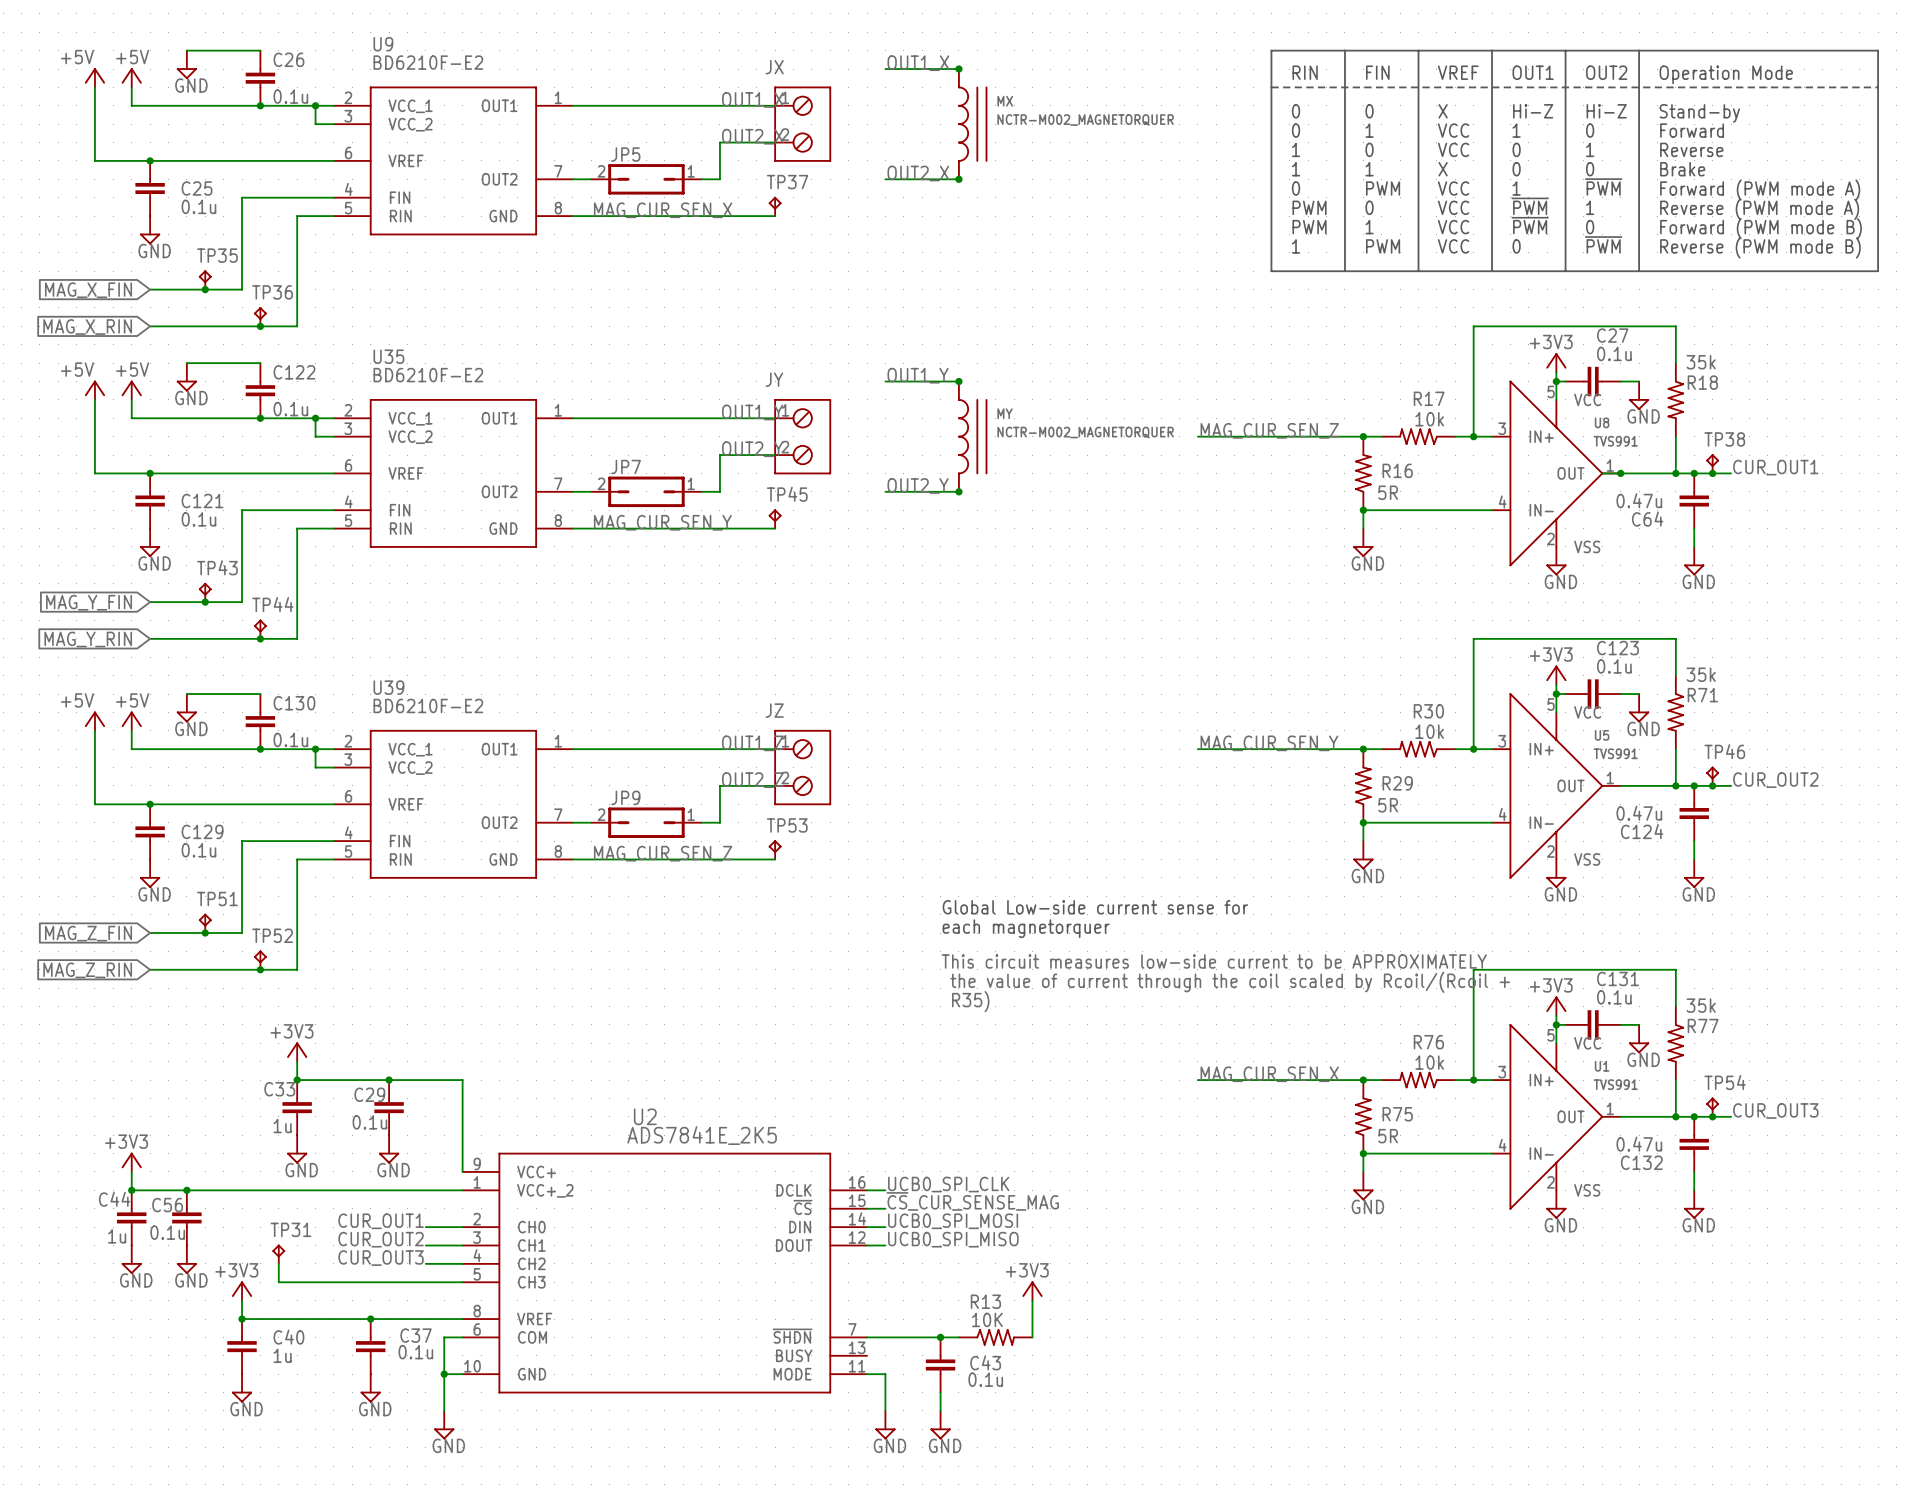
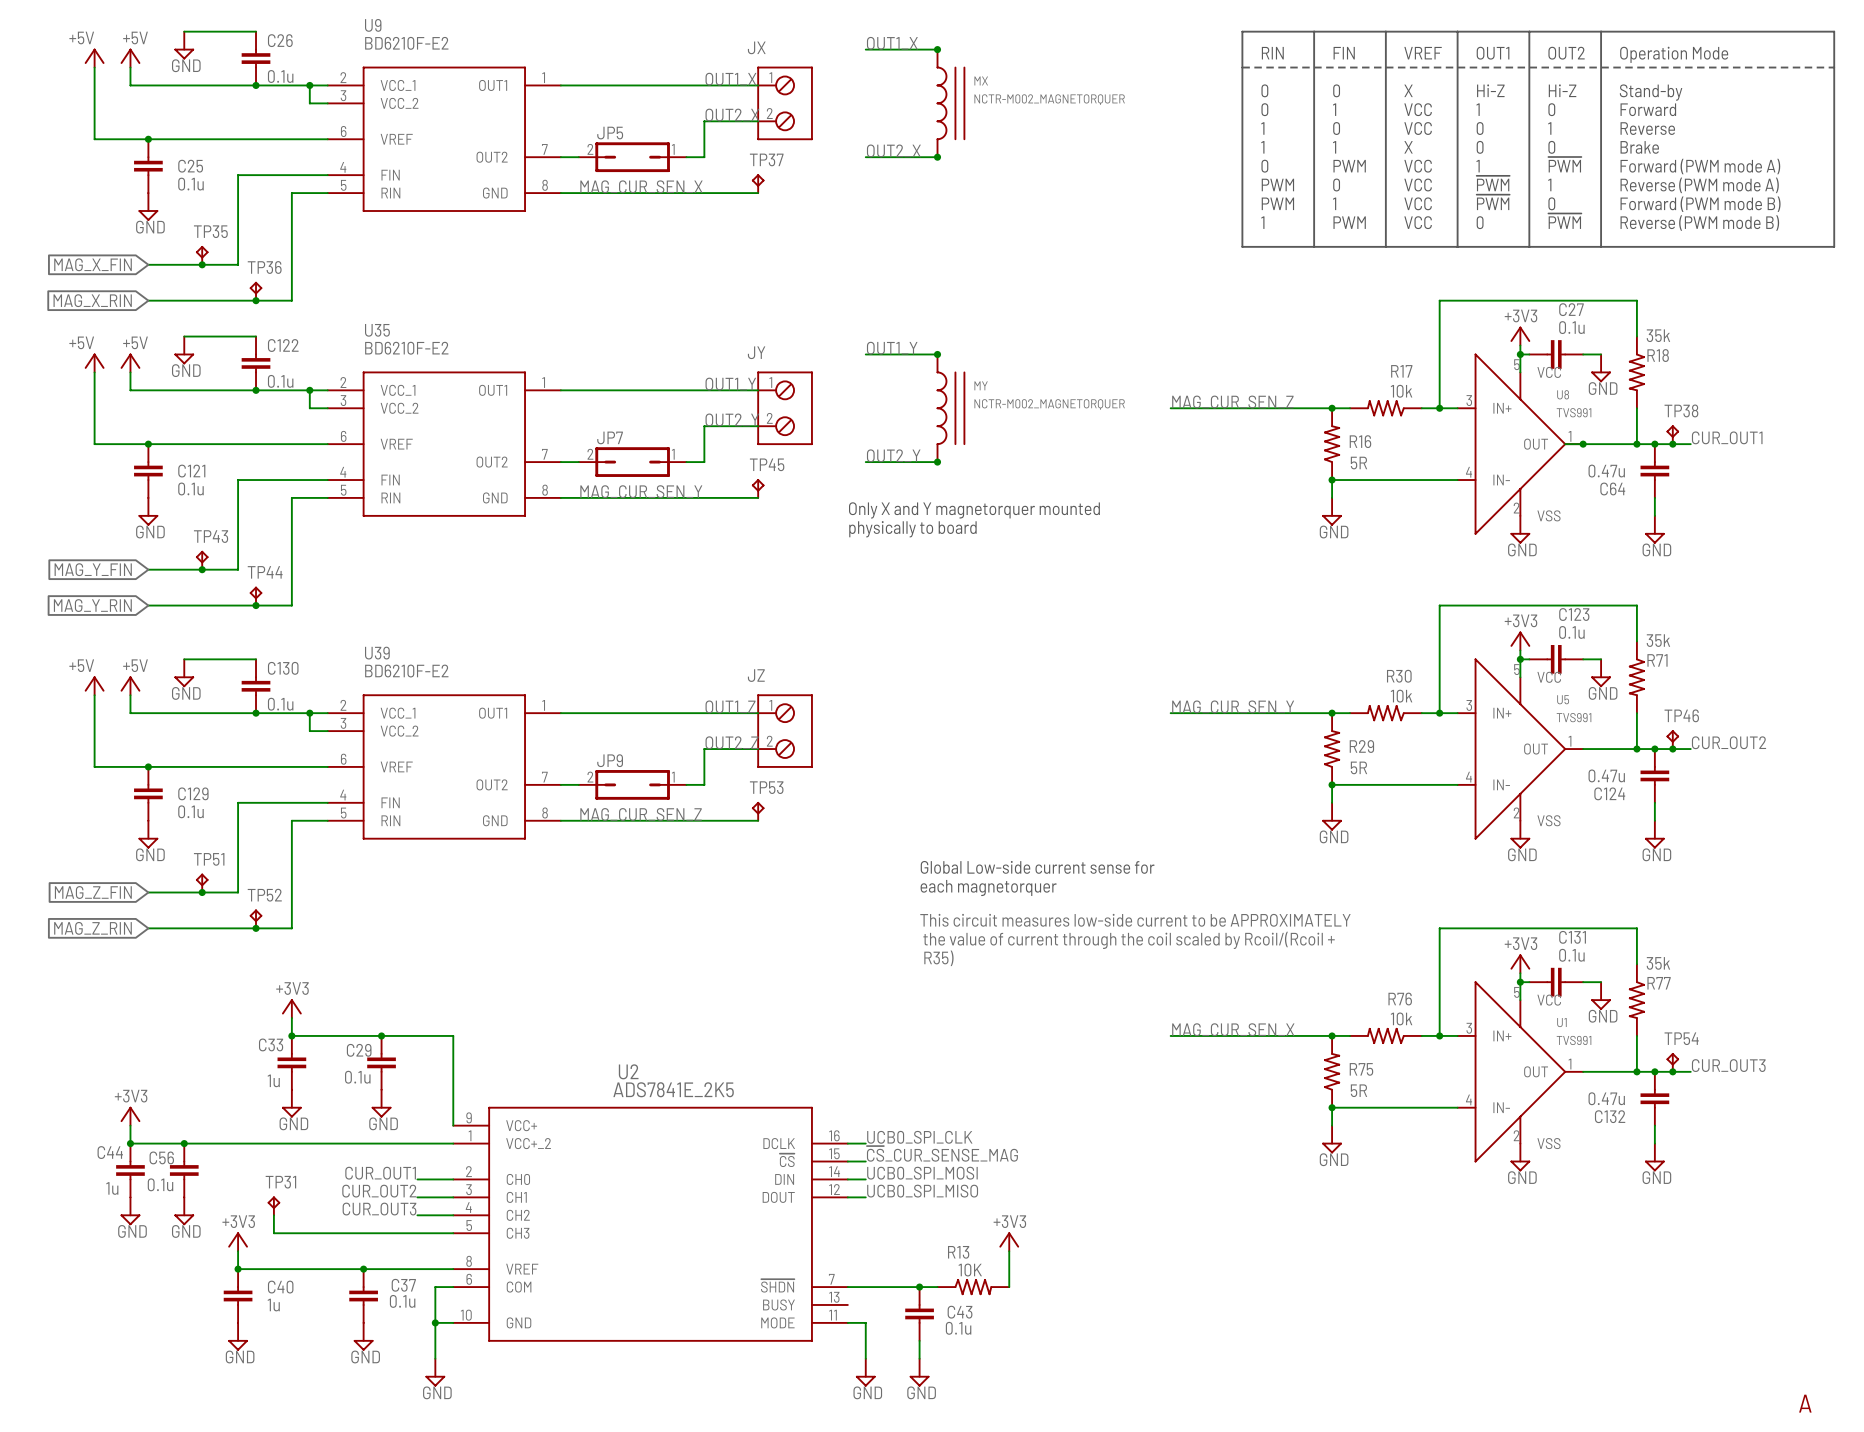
text: none -> Only X and Y magnetorquer mounted (974, 510)
text: none -> physically to board (912, 529)
text: none -> A (1805, 1403)

